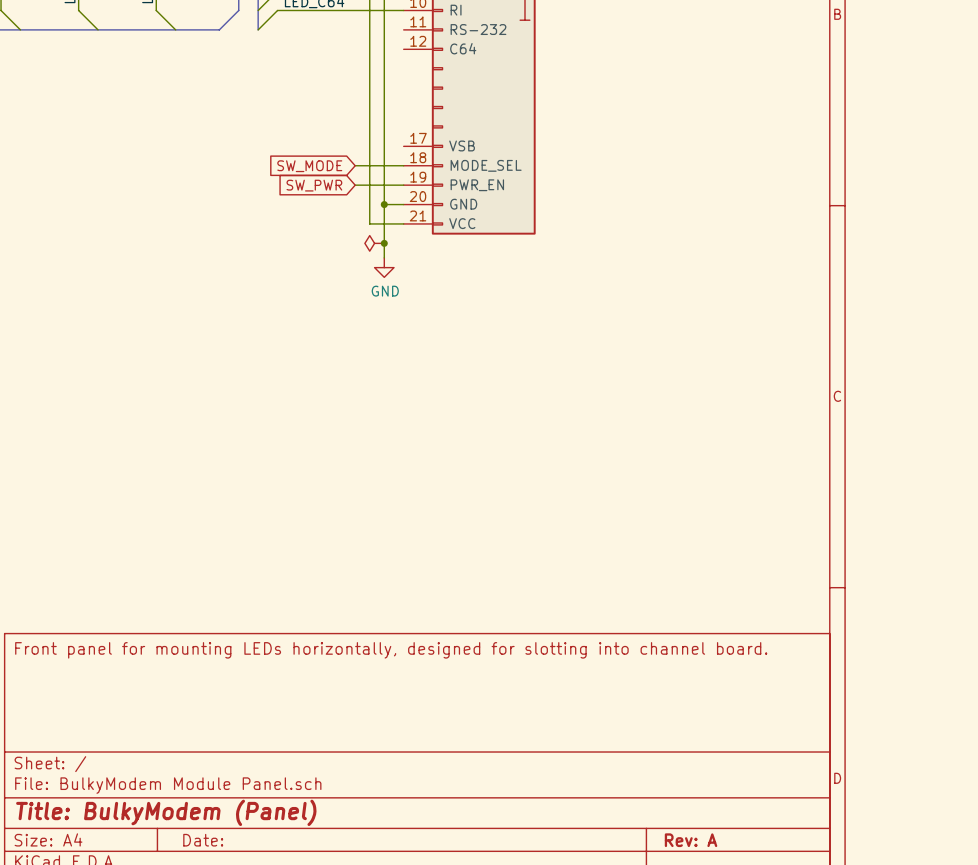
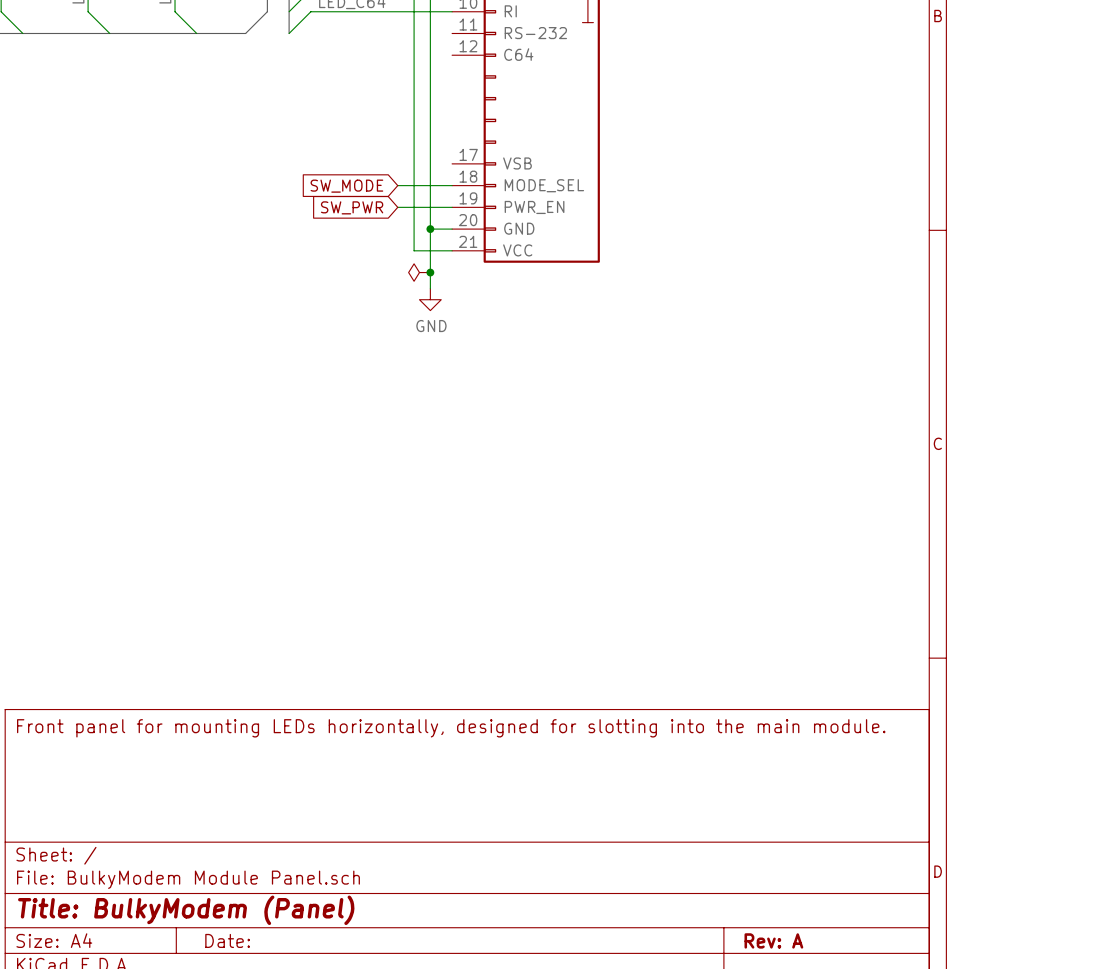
title block: Front panel for mounting LEDs horizontally, designed for slotting into channel board. (391, 650) -> Front panel for mounting LEDs horizontally, designed for slotting into the main module. (451, 728)

